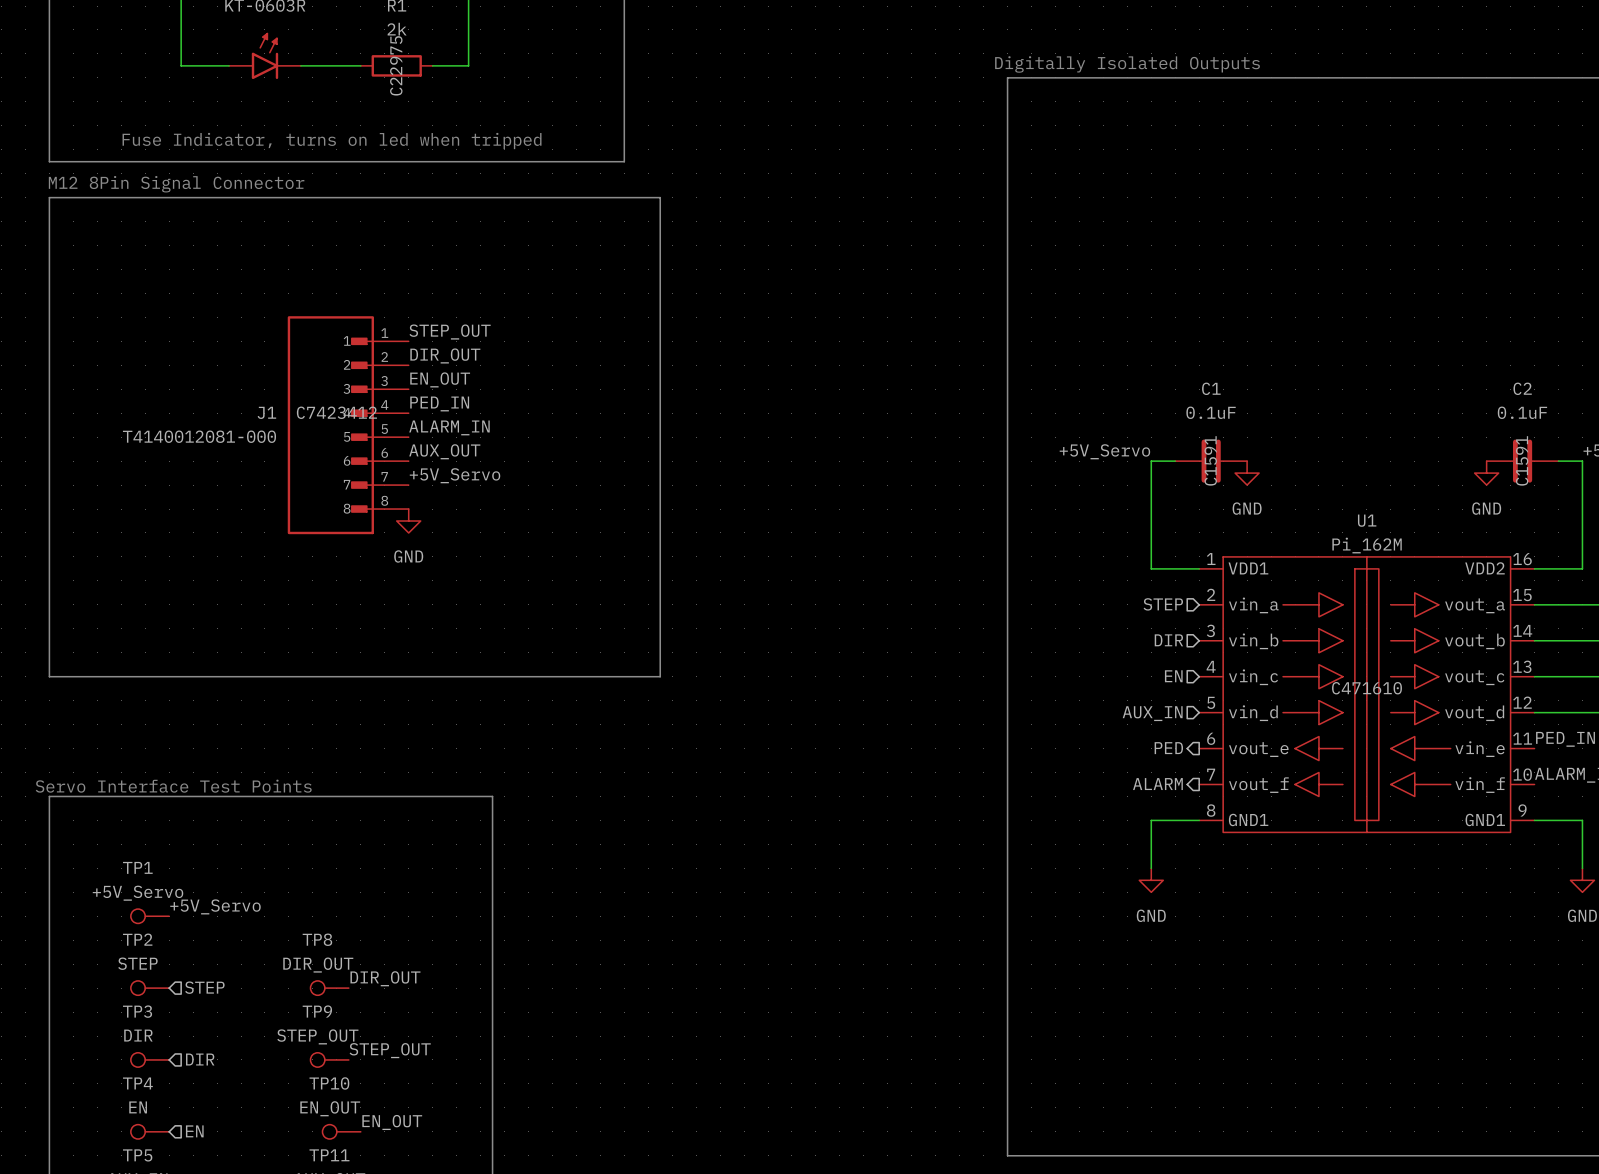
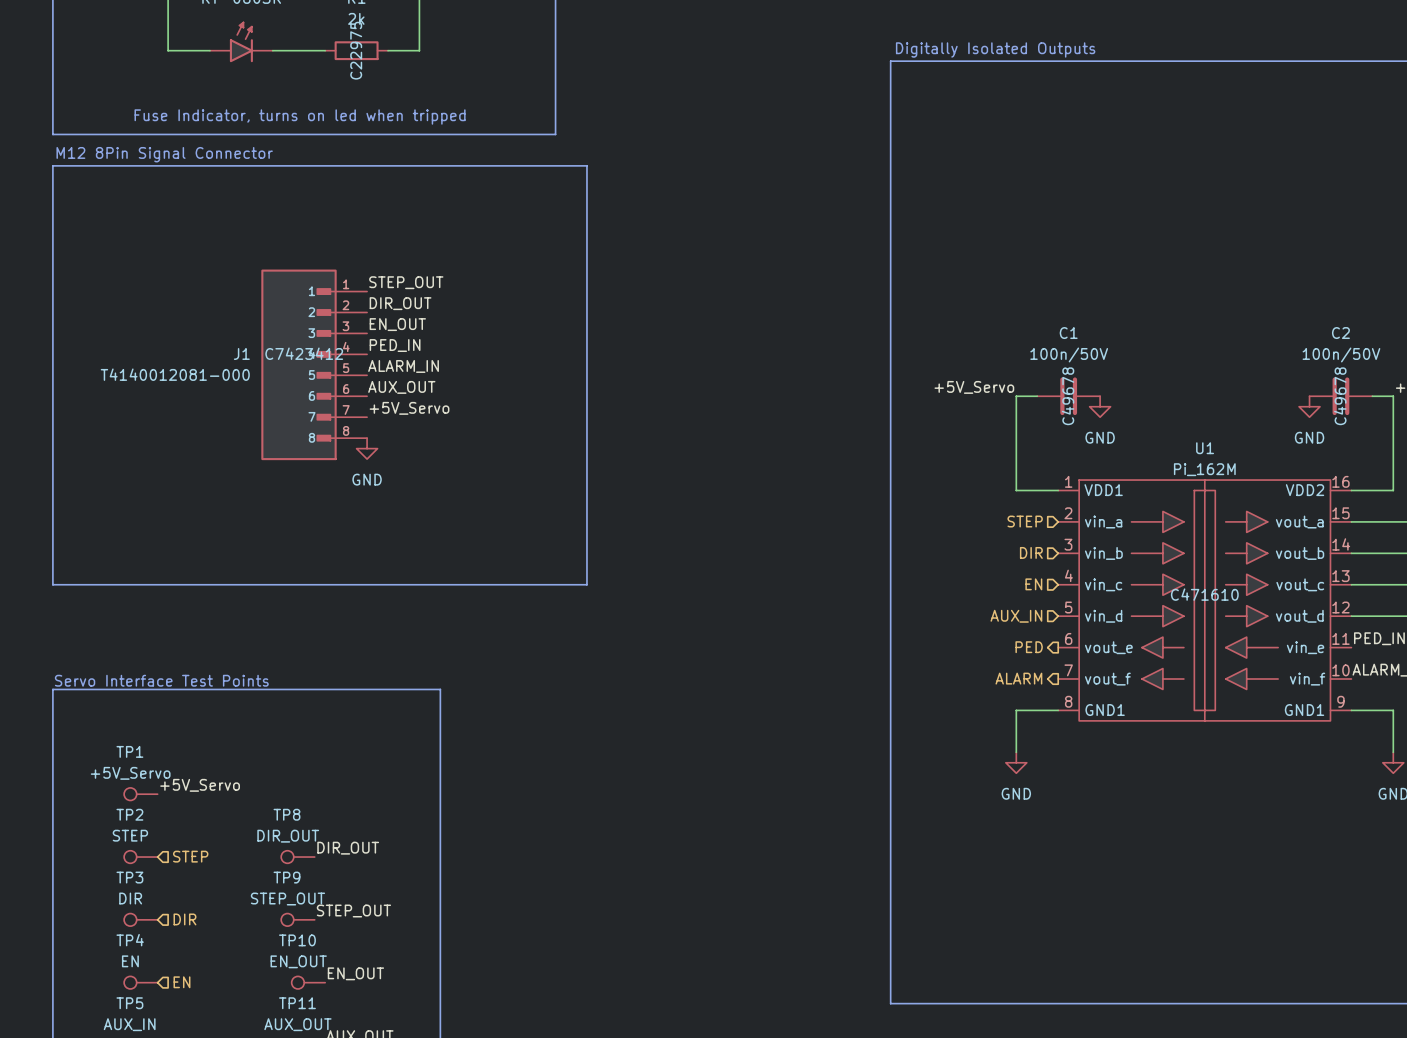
C1 value: 0.1uF (1211, 412) -> 100n/50V (1069, 354)
C2 value: 0.1uF (1522, 412) -> 100n/50V (1341, 354)
C1 text: C1591 (1210, 460) -> C49678 (1068, 396)
C2 text: C1591 (1522, 460) -> C49678 (1340, 396)

